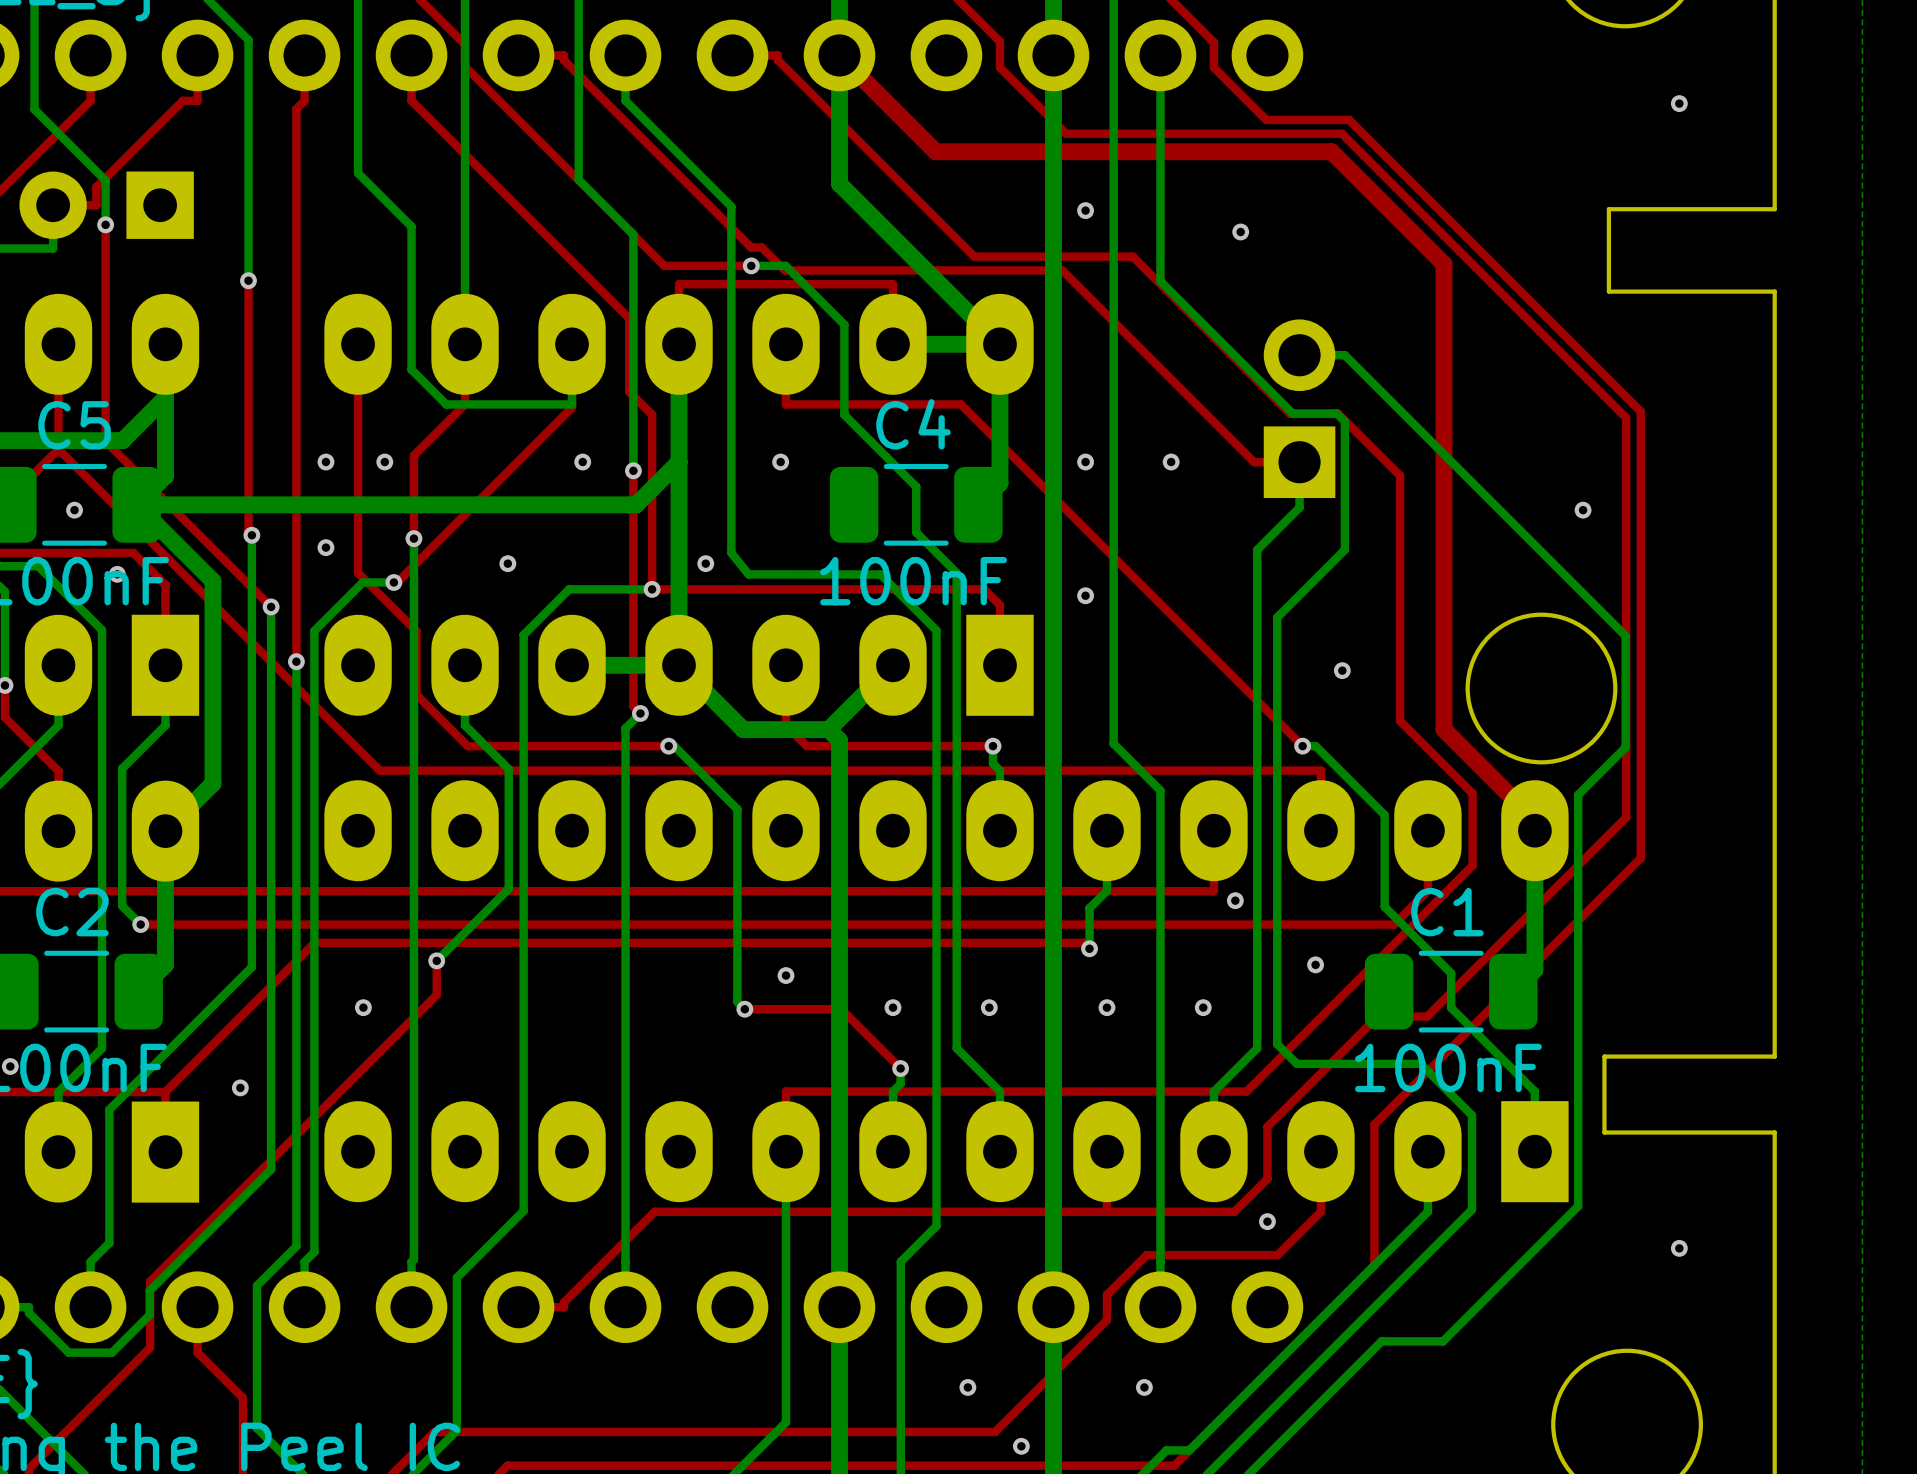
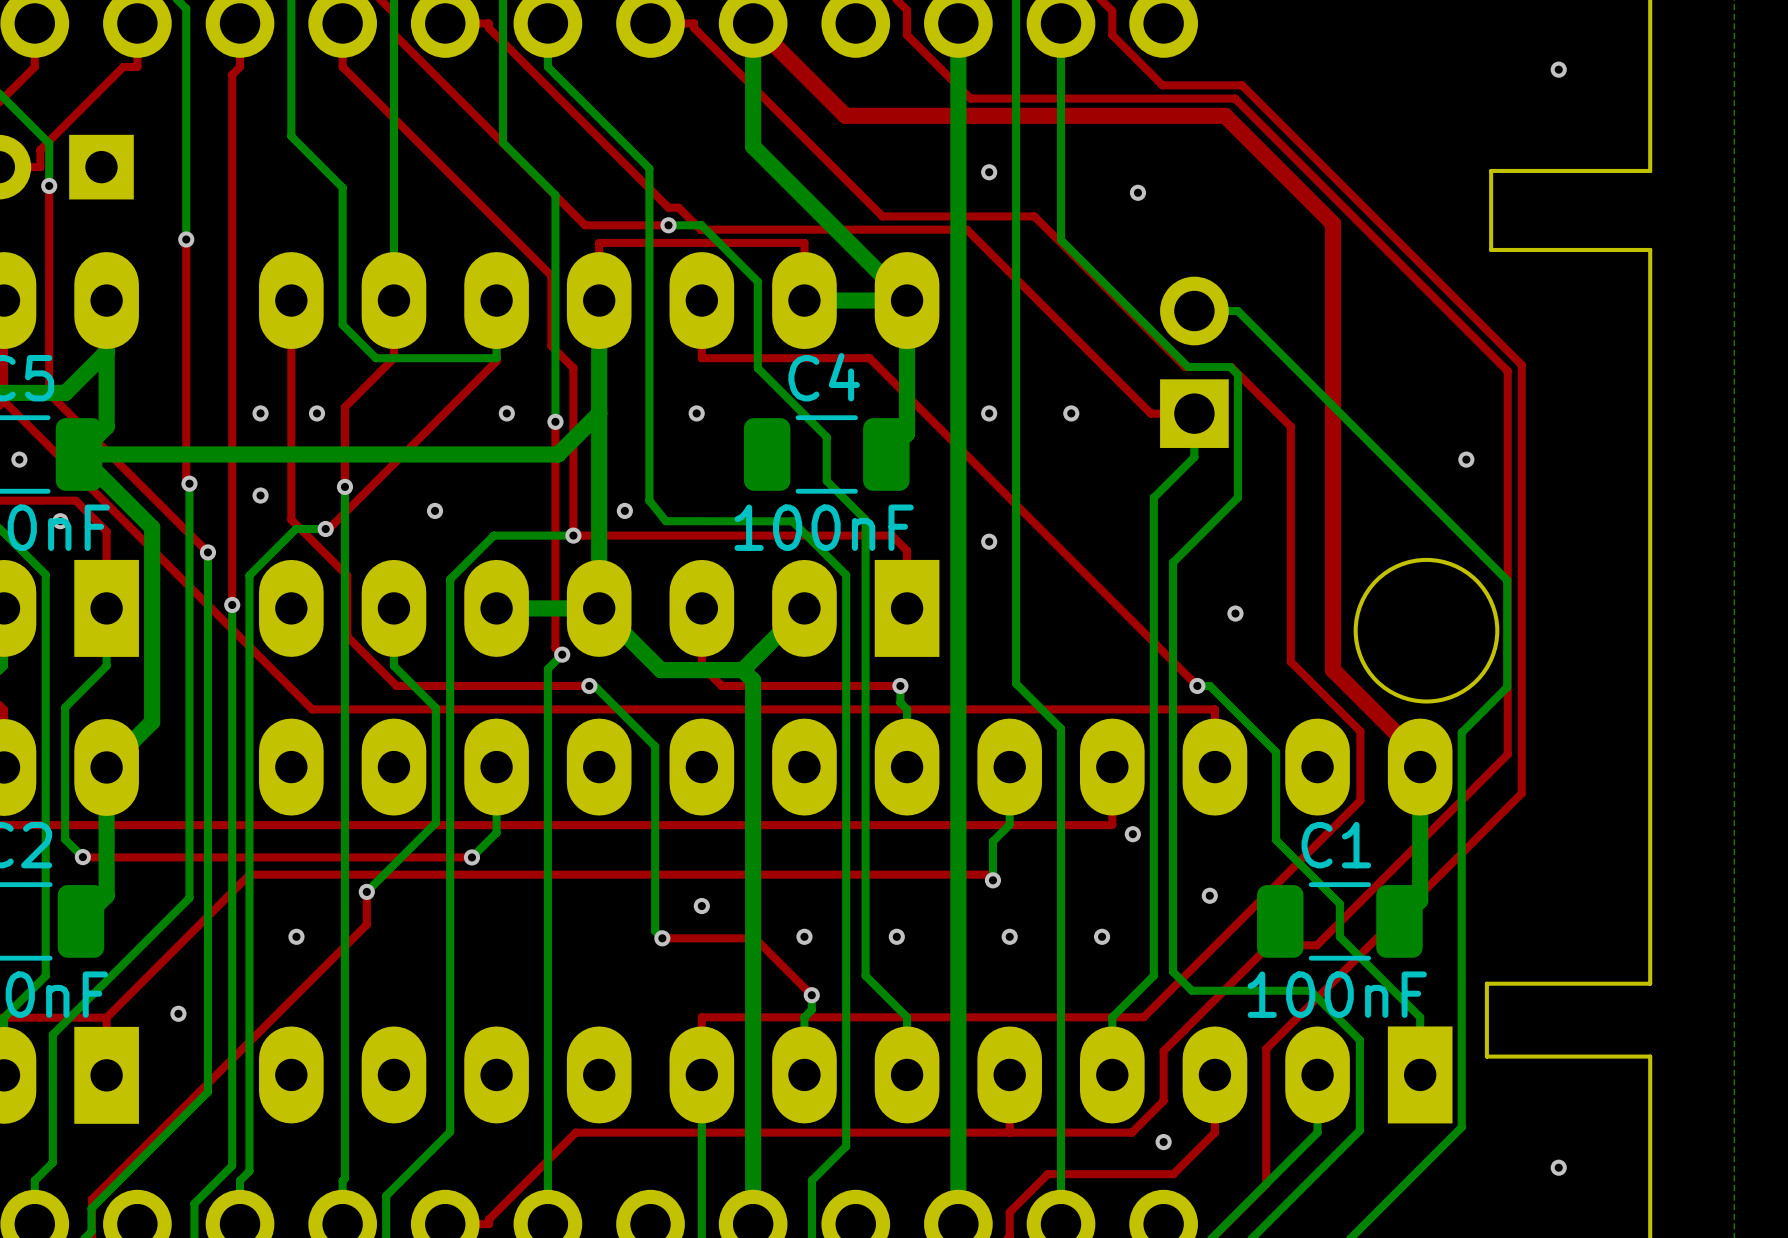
bottom track: none -> (496, 767) (496, 832) (471, 857)
top track: (1427, 830) (1427, 890) (1394, 924) (140, 924) -> (471, 857) (83, 857)
via: none -> (471, 857)

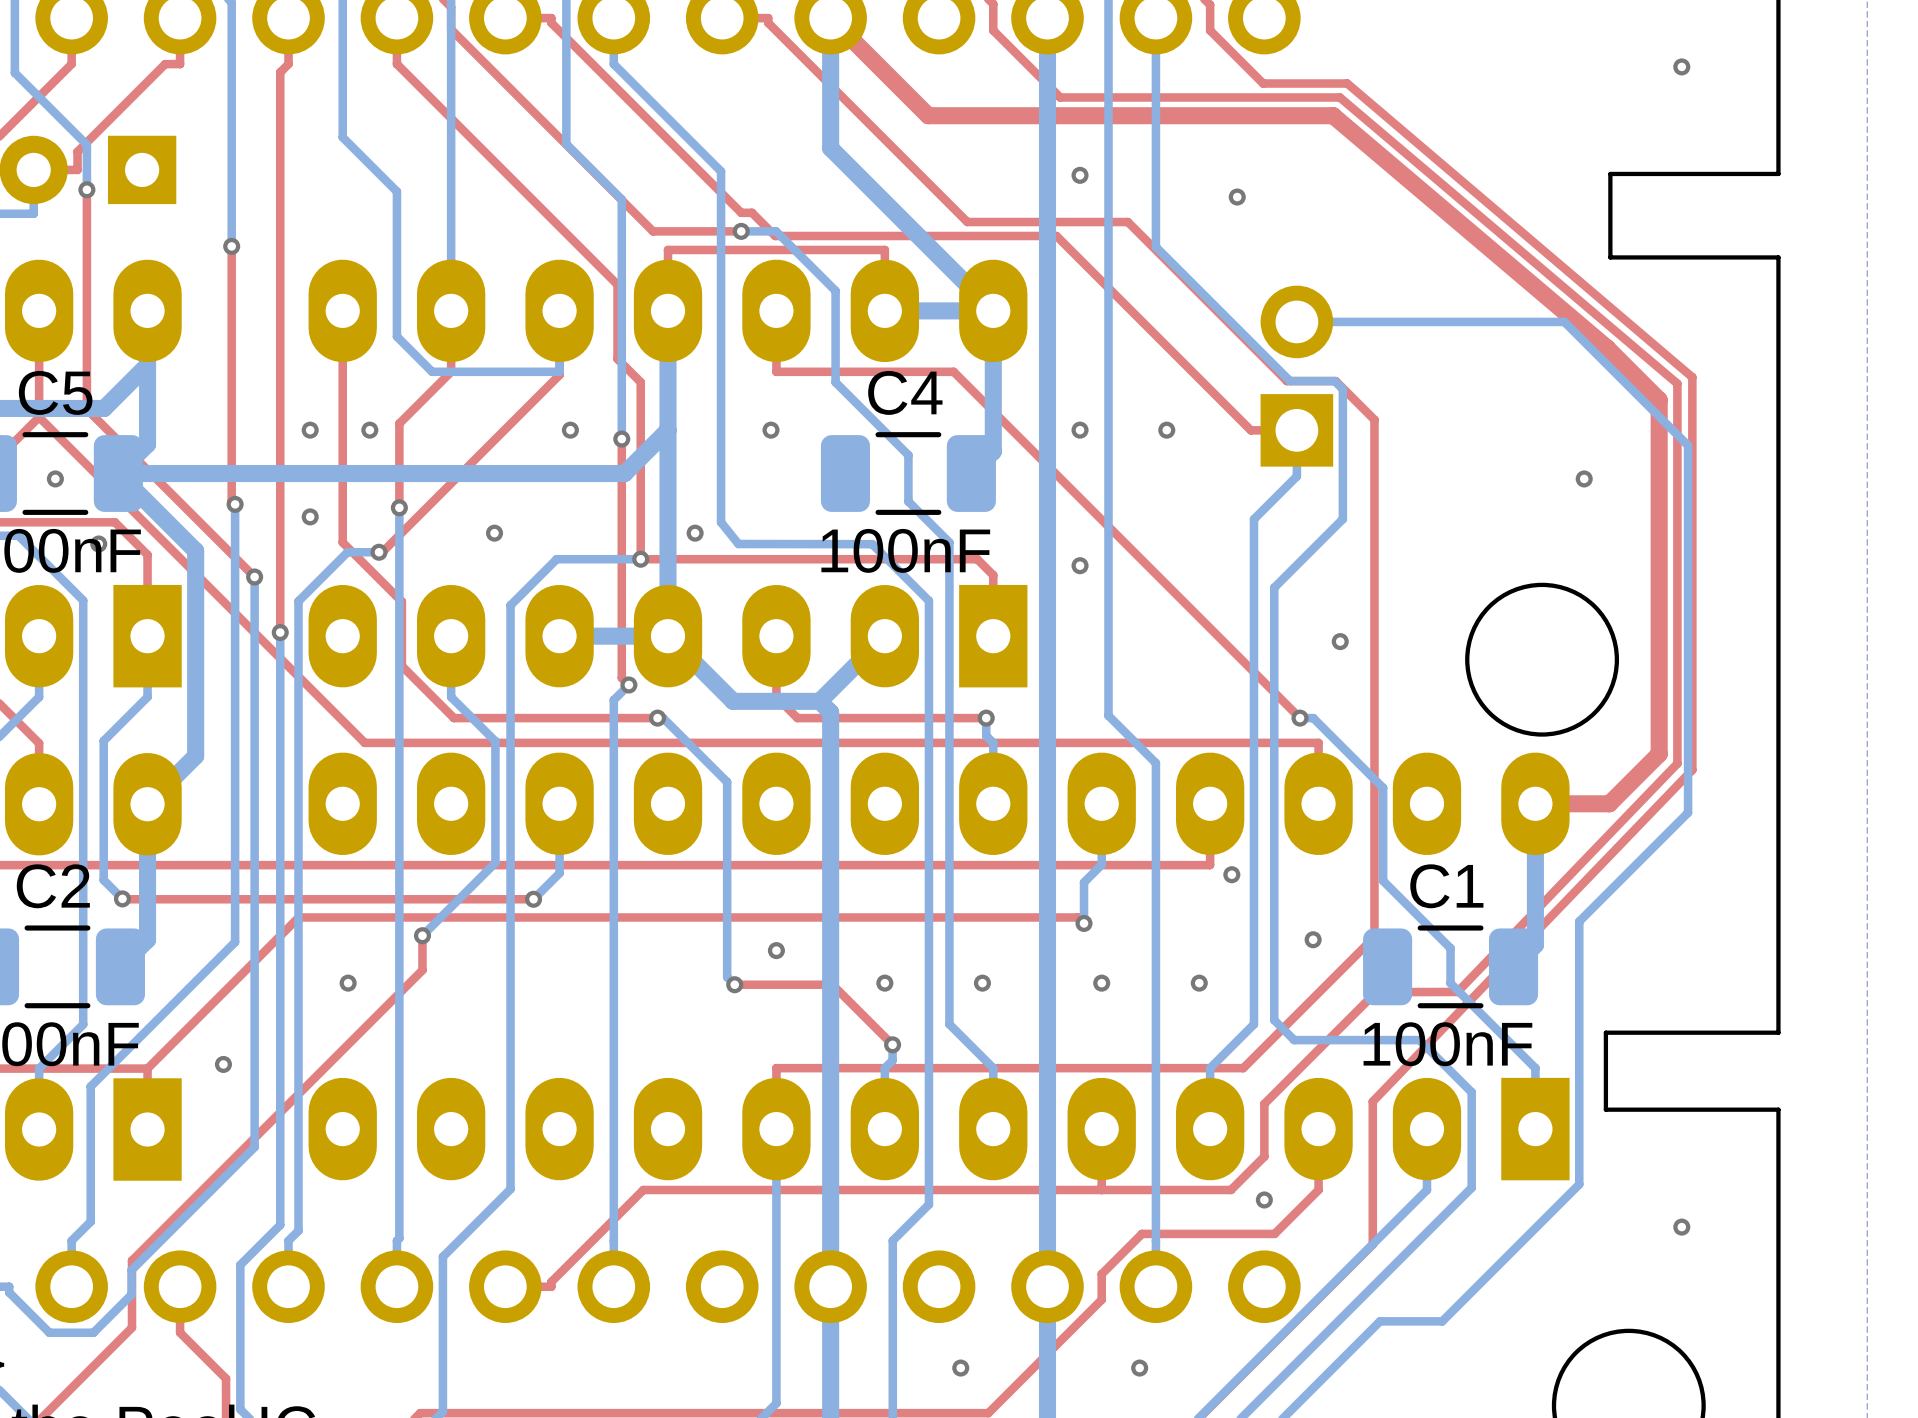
top track: (1242, 85) (1521, 364) (1521, 793) (1266, 1048) -> (1347, 83) (1692, 377) (1692, 769) (1372, 1101)
top track: (1235, 98) (1507, 371) (1507, 754) (1316, 945) (1269, 945) -> (1339, 97) (1677, 383) (1677, 763) (1457, 991) (1376, 992)
top track: (1225, 115) (1332, 223) (1332, 669) (1420, 757) (1420, 767) -> (1329, 115) (1333, 115) (1607, 347) (1659, 400) (1659, 754) (1609, 803) (1535, 803)
bottom track: (1237, 311) (1507, 580) (1507, 687) (1461, 732) (1461, 878) -> (1342, 321) (1564, 321) (1688, 445) (1688, 812) (1579, 921)
top track: (1267, 403) (1290, 426) (1290, 661) (1360, 731) (1360, 800) (1268, 892) -> (1374, 419) (1374, 936)

